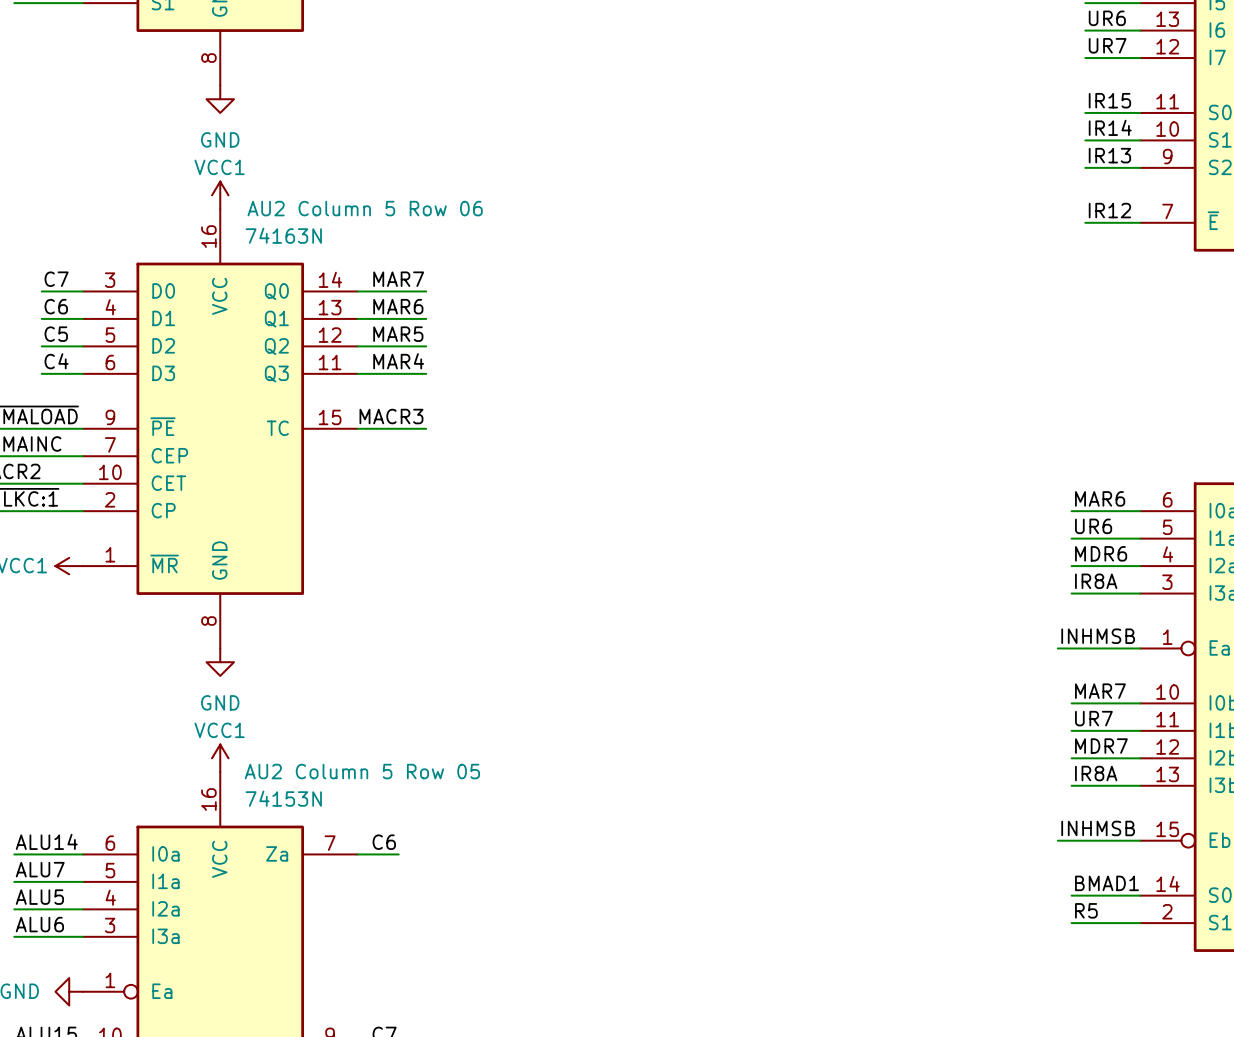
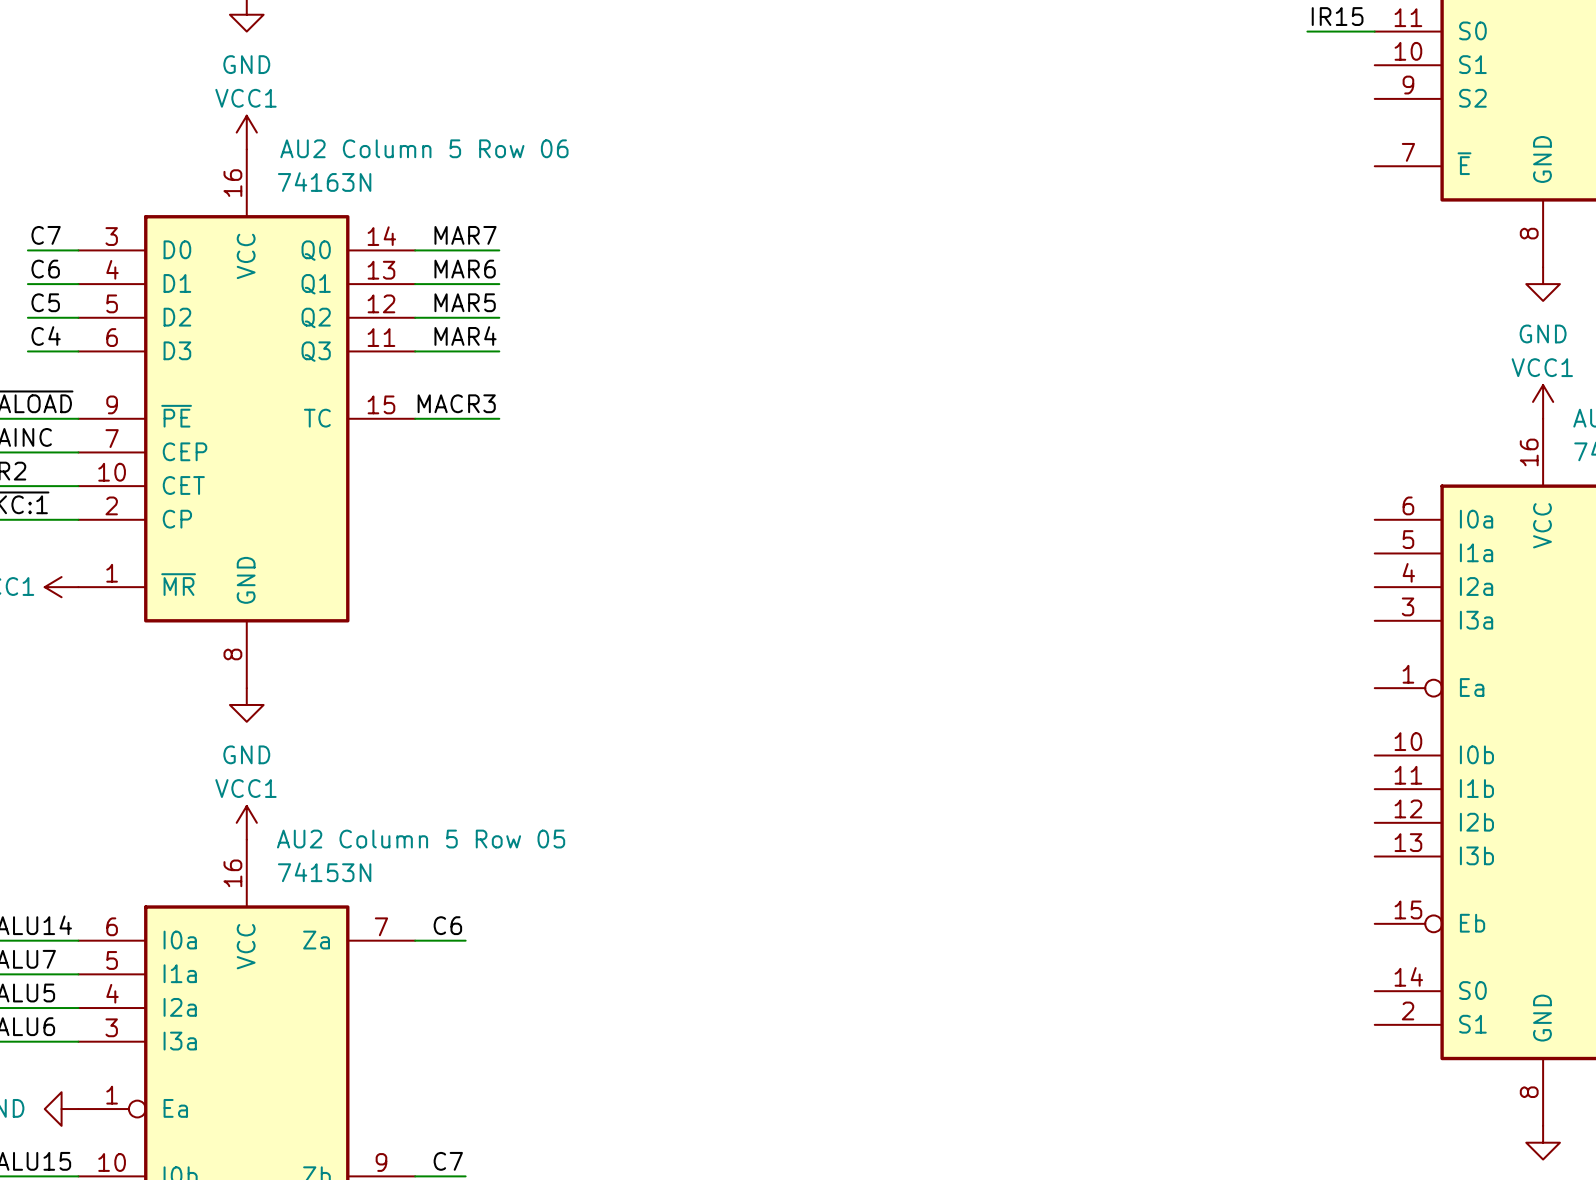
label: IR14 (1110, 127) -> none
wire: (1085, 140) (1140, 140) -> none
label: IR13 (1109, 155) -> none
wire: (1085, 167) (1140, 167) -> none
label: IR12 (1109, 210) -> none
wire: (1085, 222) (1140, 222) -> none
label: MAR6 (1100, 498) -> none
wire: (1071, 511) (1140, 511) -> none
label: UR6 (1093, 526) -> none
wire: (1071, 538) (1140, 538) -> none
label: MDR6 (1101, 553) -> none
wire: (1071, 566) (1140, 566) -> none
label: IR8A (1096, 581) -> none
wire: (1071, 593) (1140, 593) -> none
label: INHMSB (1098, 636) -> none
wire: (1057, 648) (1140, 648) -> none
label: MAR7 (1100, 691) -> none
wire: (1071, 703) (1140, 703) -> none
label: UR7 (1093, 718) -> none
wire: (1071, 730) (1140, 730) -> none
label: MDR7 (1101, 746) -> none
wire: (1071, 758) (1140, 758) -> none
label: IR8A (1096, 773) -> none
wire: (1071, 785) (1140, 785) -> none
label: INHMSB (1098, 828) -> none
wire: (1057, 840) (1140, 840) -> none
label: BMAD1 (1106, 883) -> none
wire: (1071, 895) (1140, 895) -> none
label: R5 (1086, 910) -> none
wire: (1071, 923) (1140, 923) -> none

